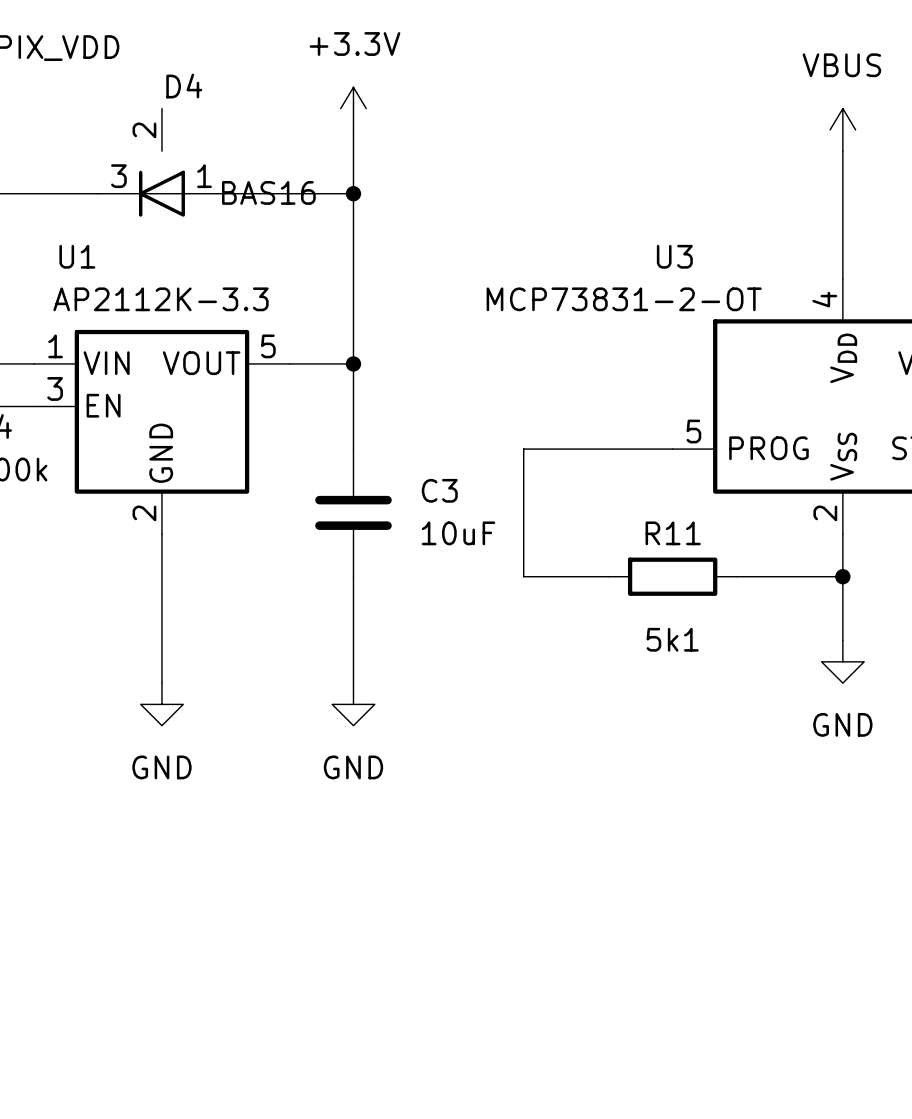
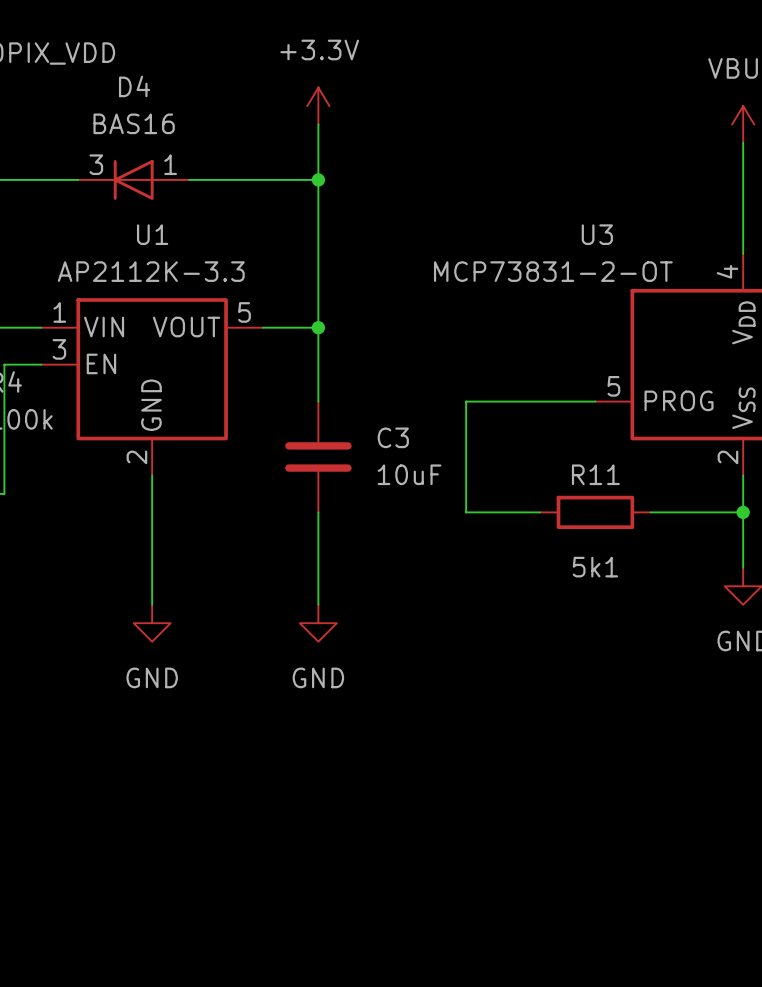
D4 name position: D4 (184, 86) -> D4 (134, 86)
D4 symbol: [98, 108, 226, 217] -> [78, 160, 190, 200]
D4 value position: BAS16 (268, 192) -> BAS16 (134, 123)
U1 name position: U1 (77, 256) -> U1 (152, 234)

